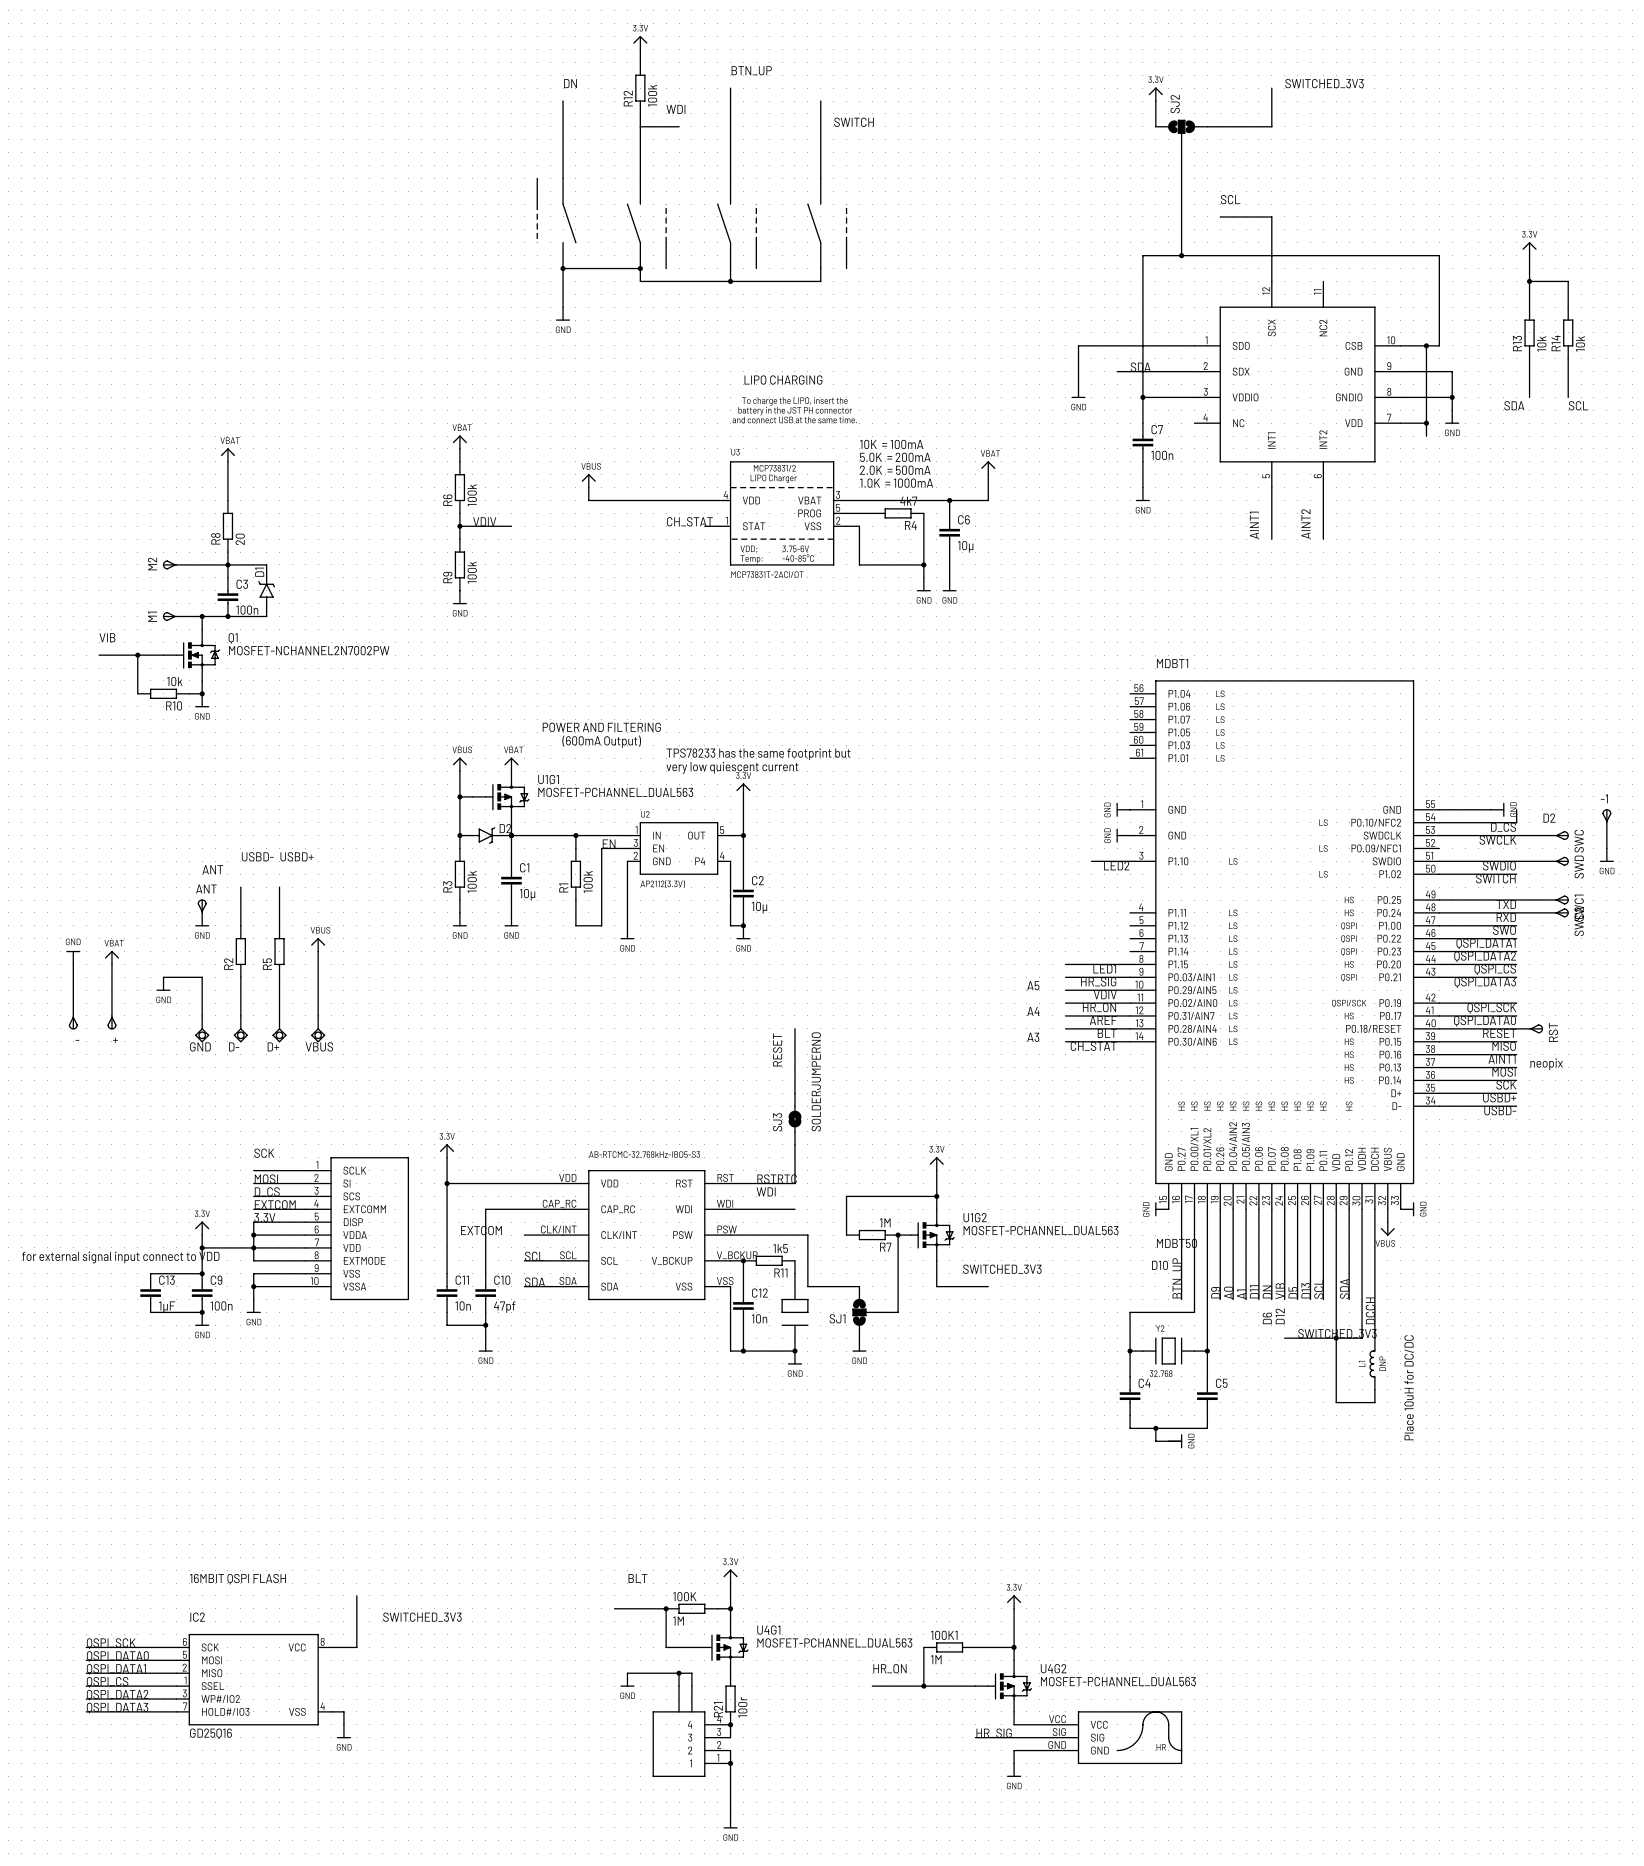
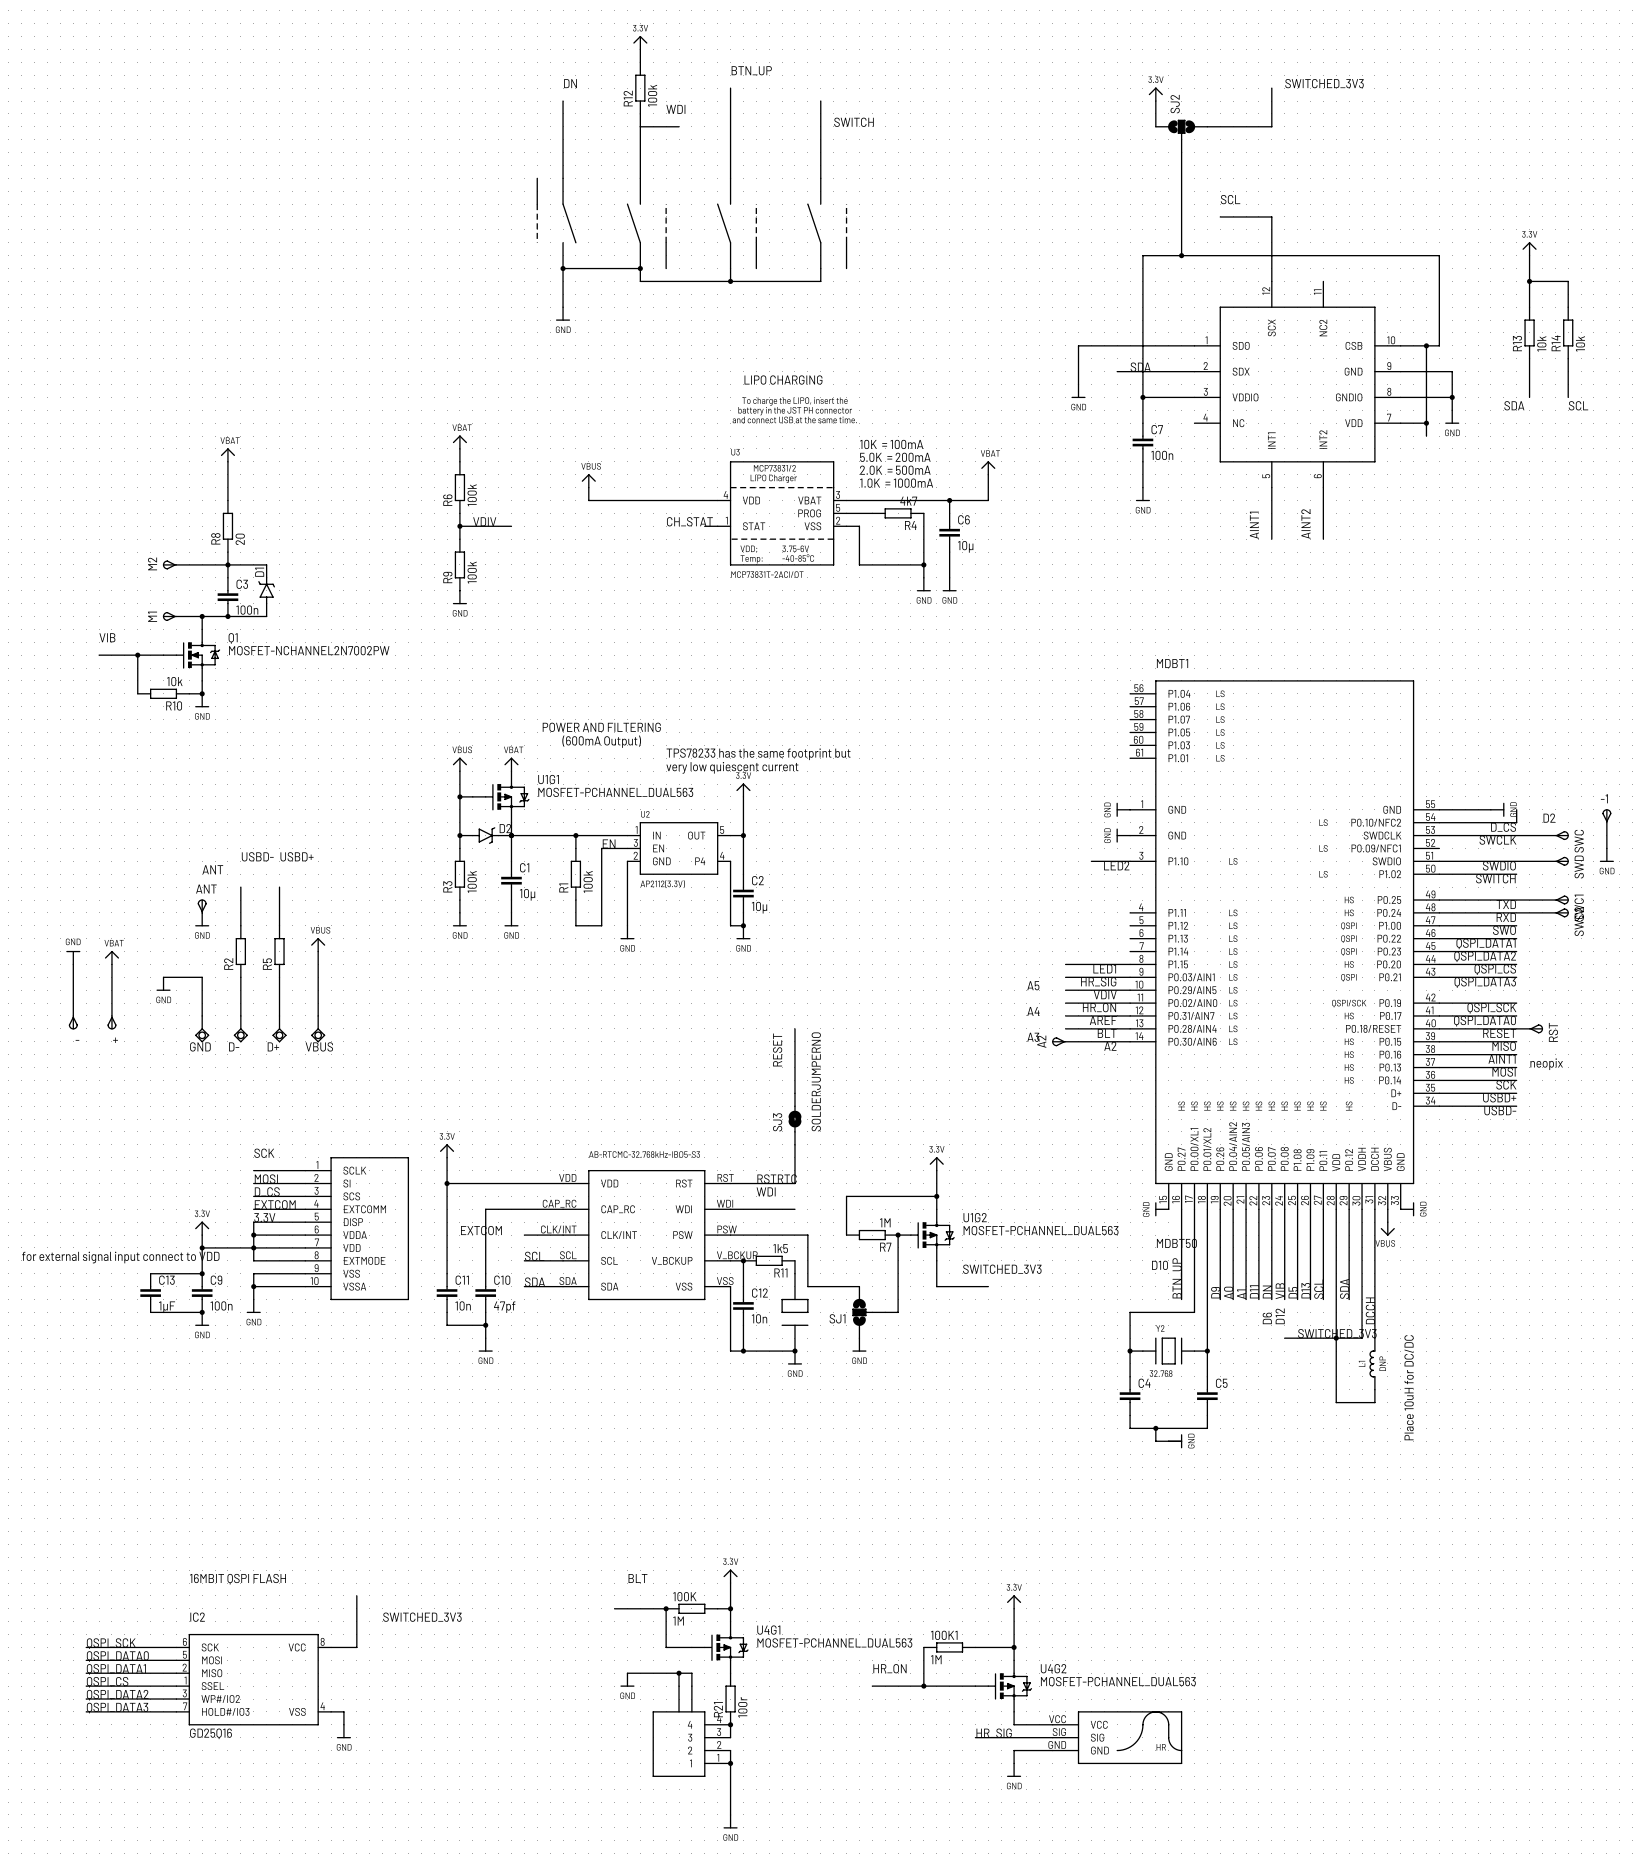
A2: none -> (1058, 1041)
label: CH_STAT (1093, 1046) -> A2 (1110, 1046)

